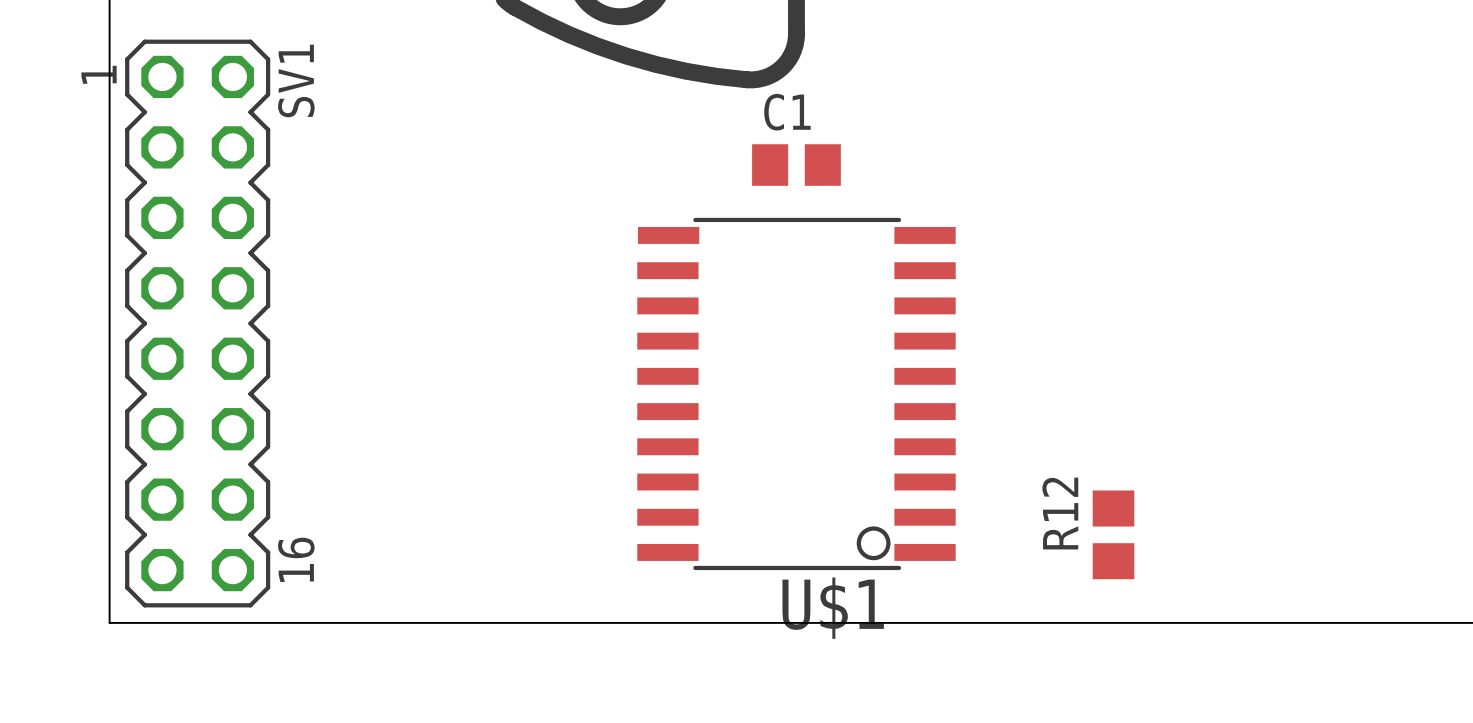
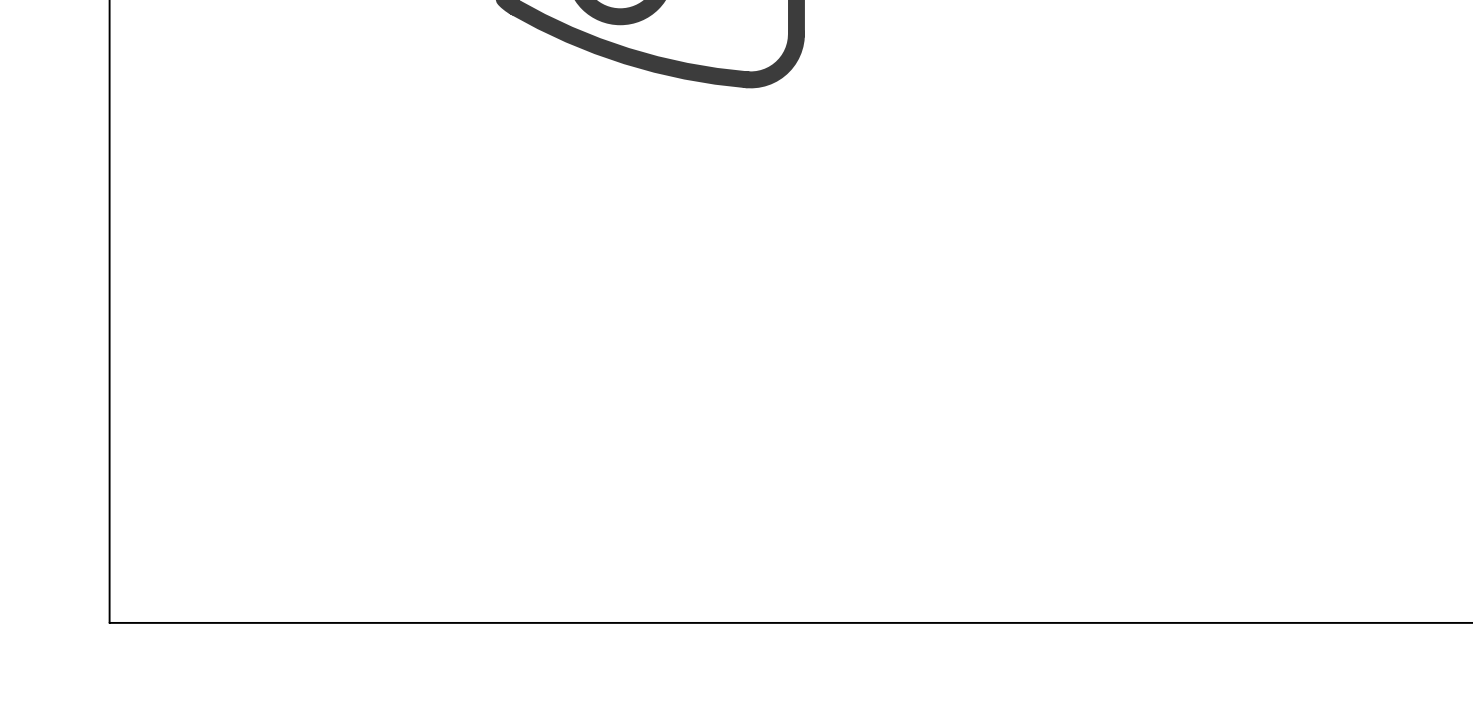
C1: (796, 165) -> none
SV1: (197, 323) -> none
U$1: (796, 393) -> none
R12: (1113, 534) -> none

